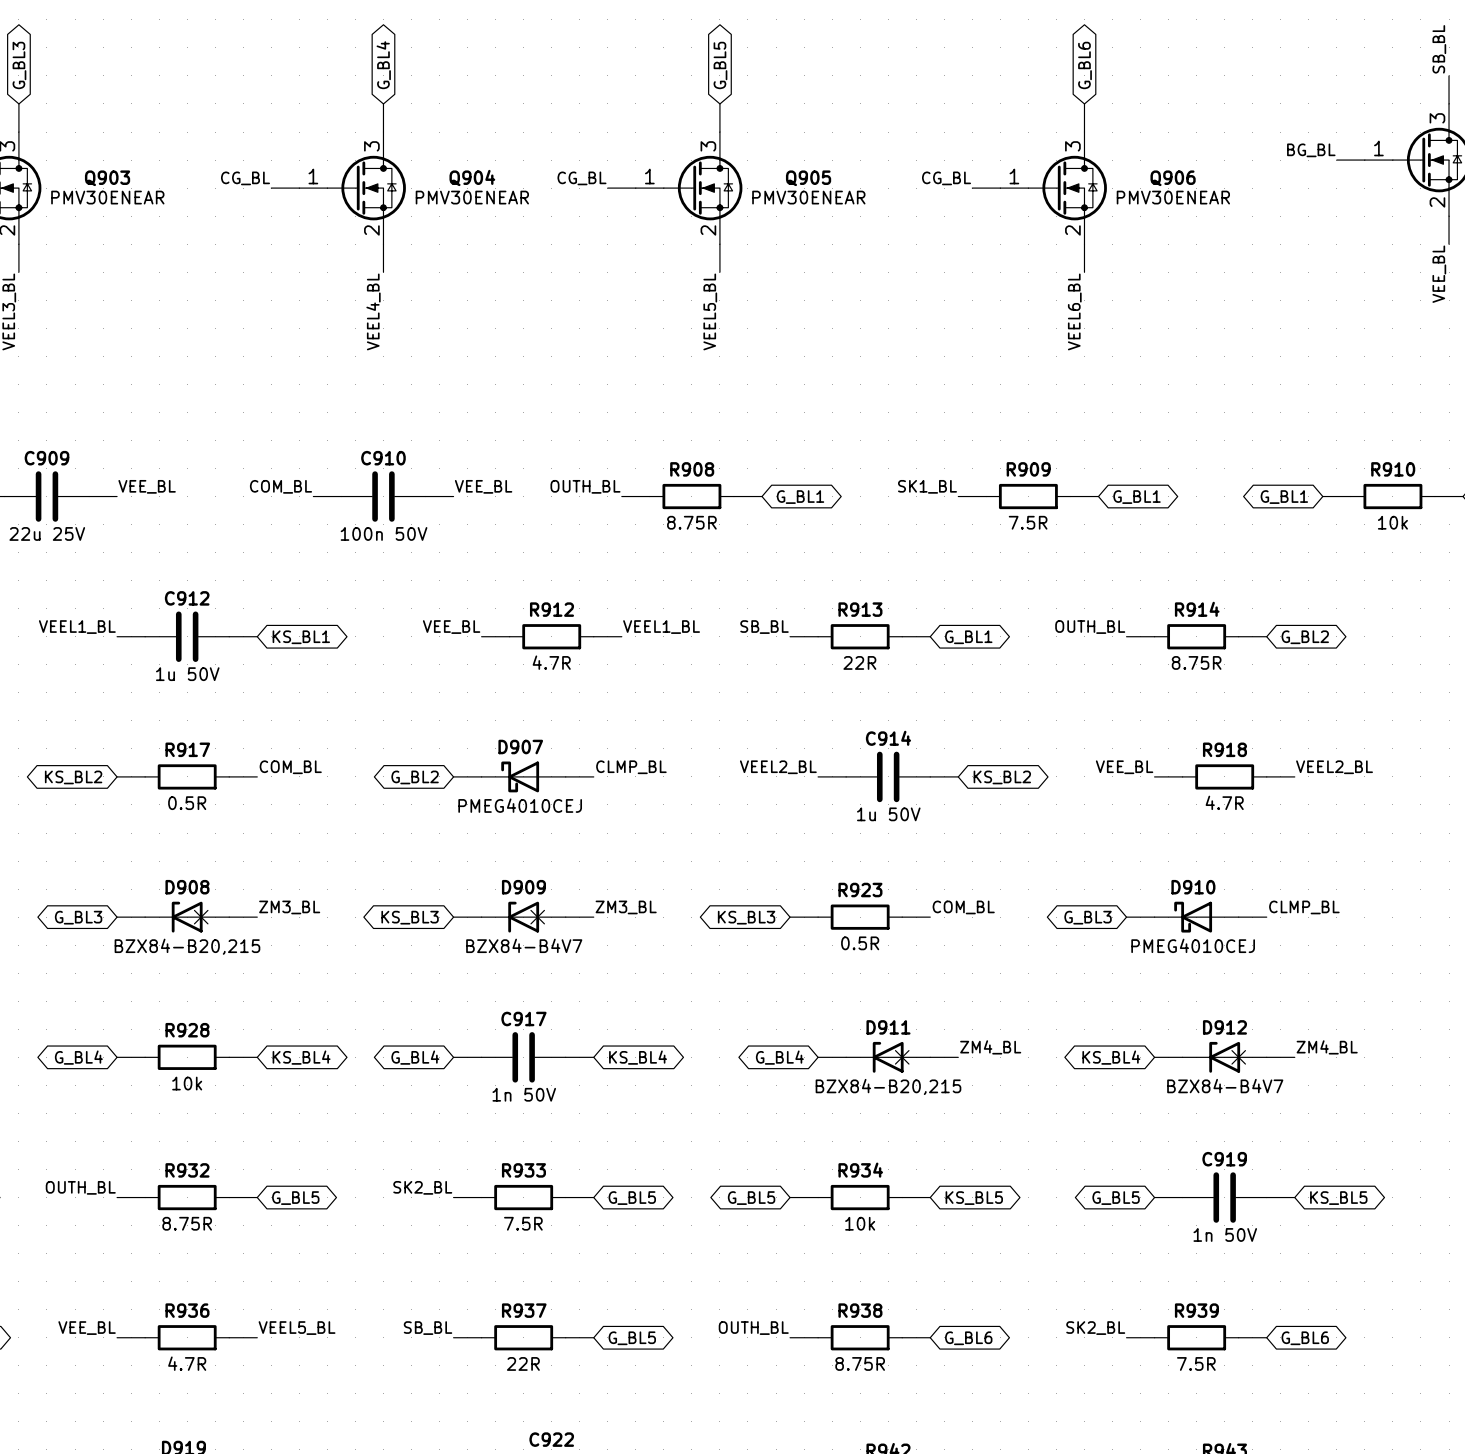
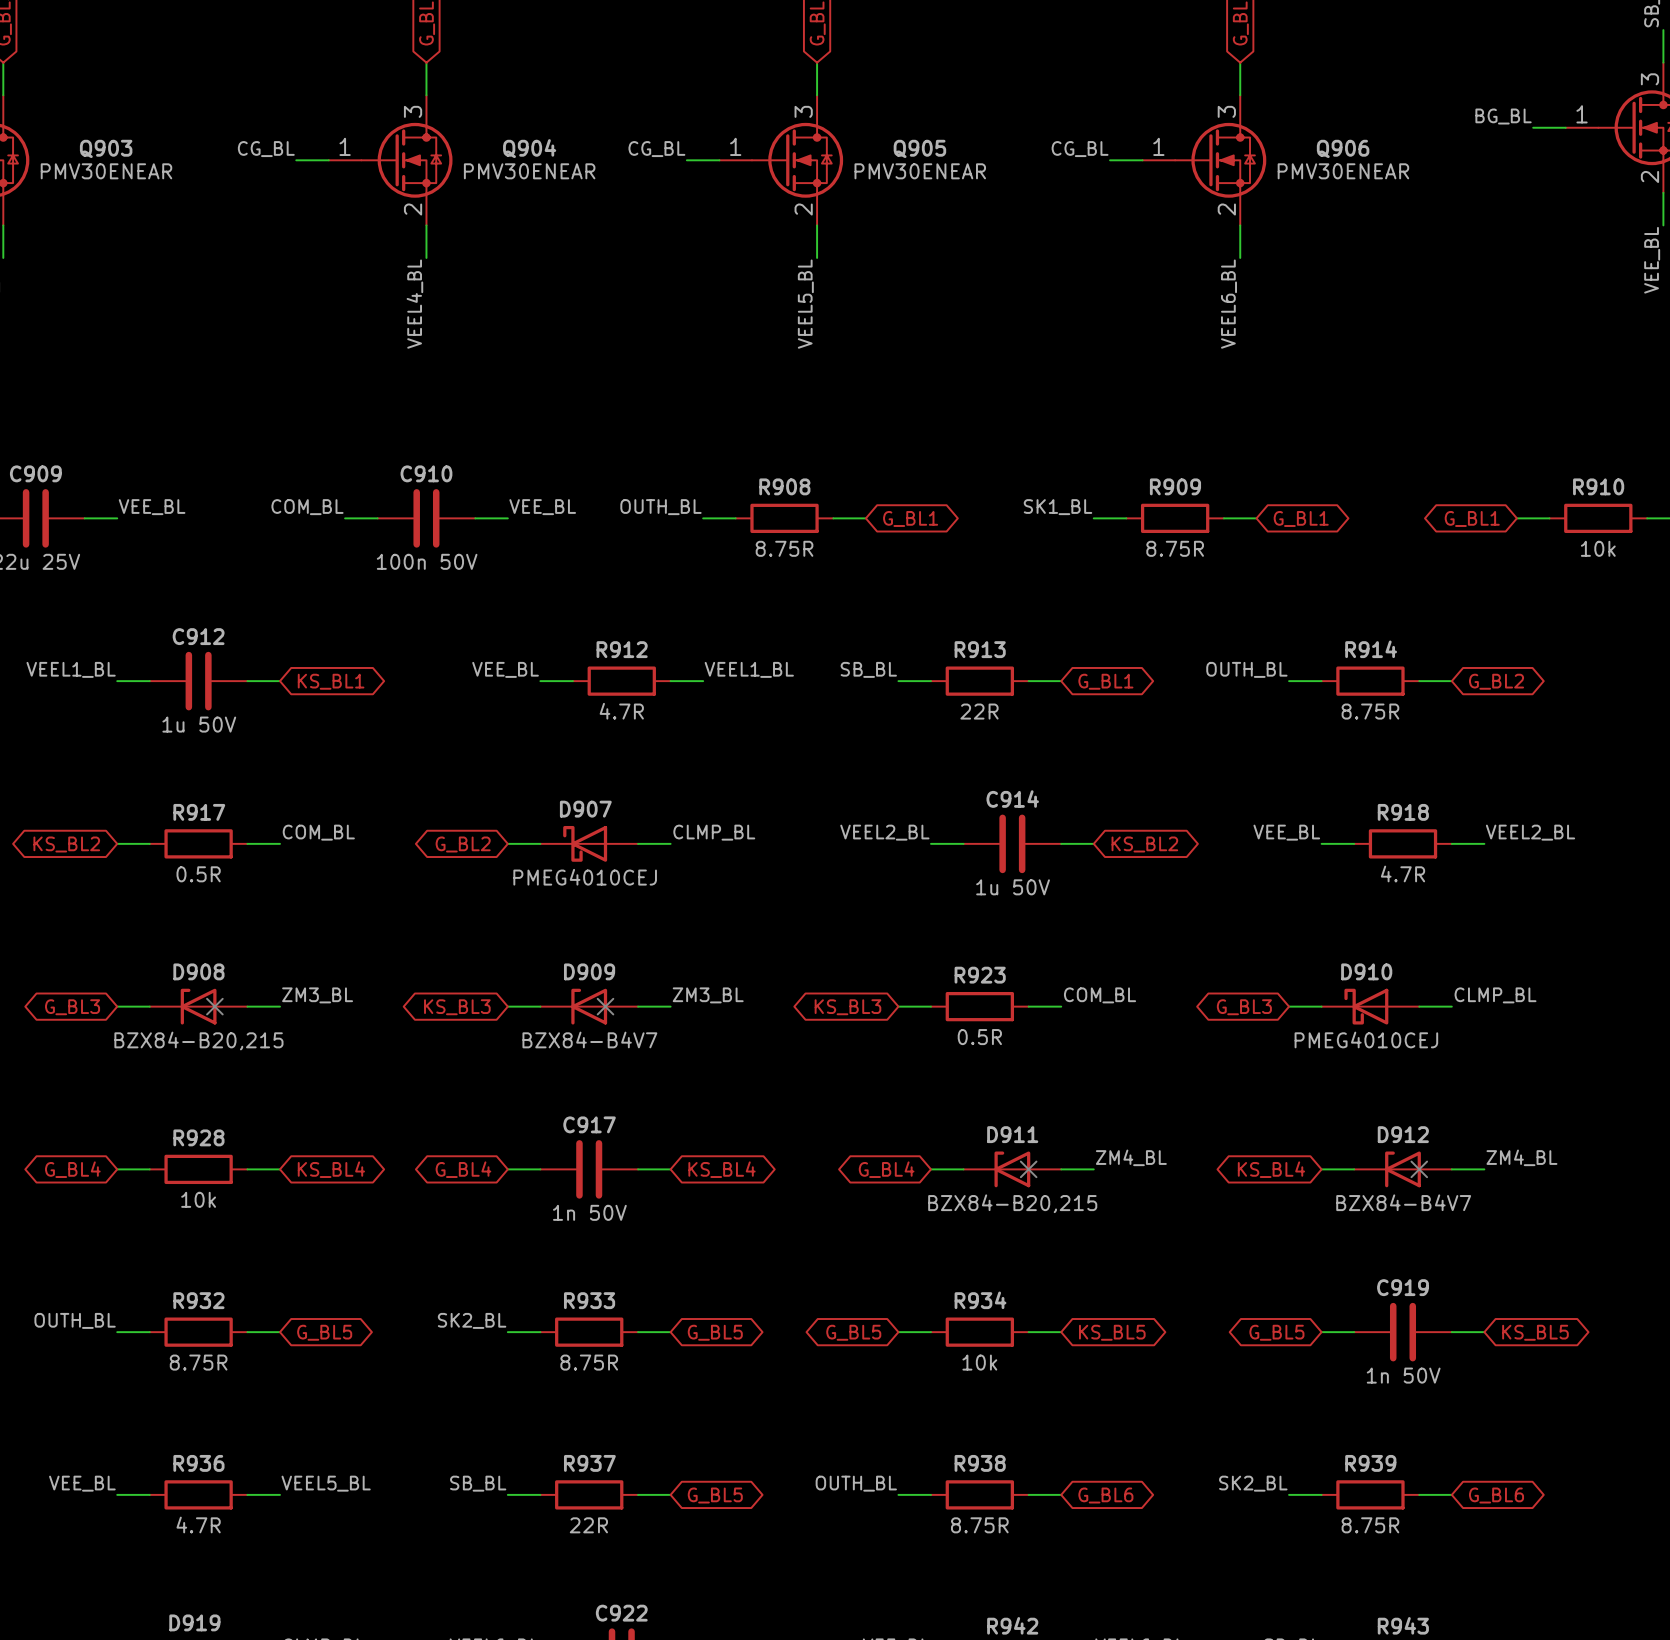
R909 value: 7.5R (1028, 522) -> 8.75R (1175, 548)
R933 value: 7.5R (523, 1223) -> 8.75R (589, 1362)
R939 value: 7.5R (1196, 1363) -> 8.75R (1370, 1525)

